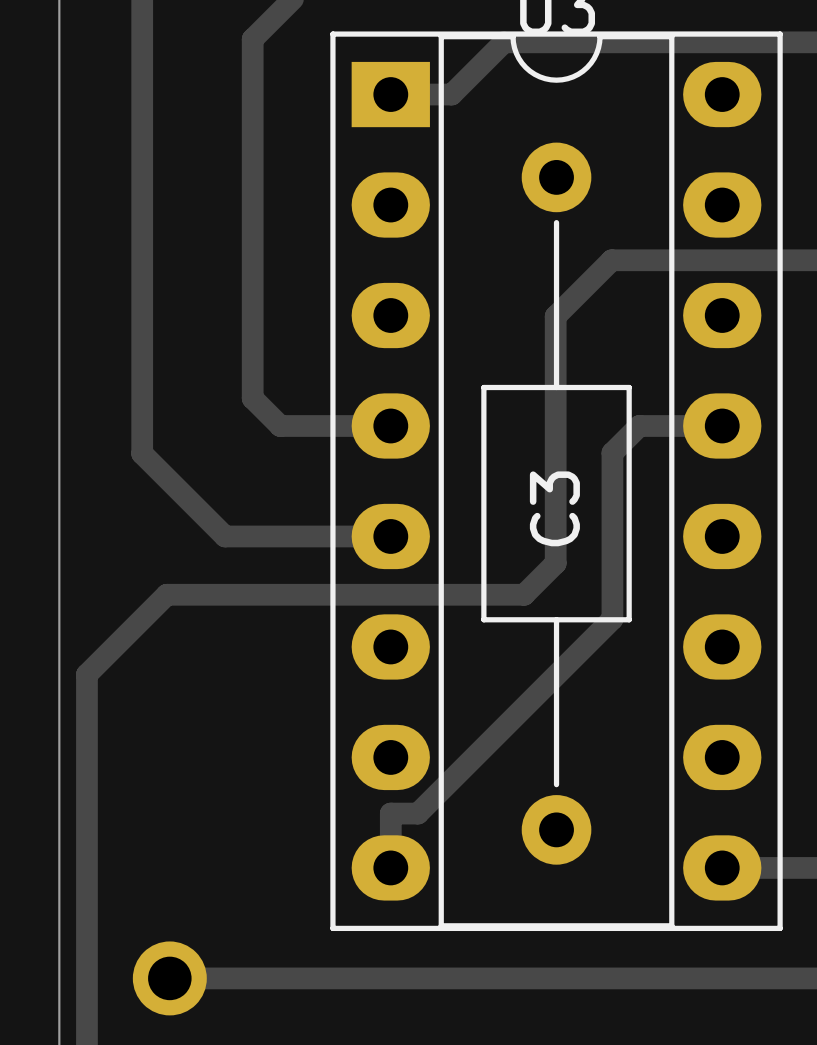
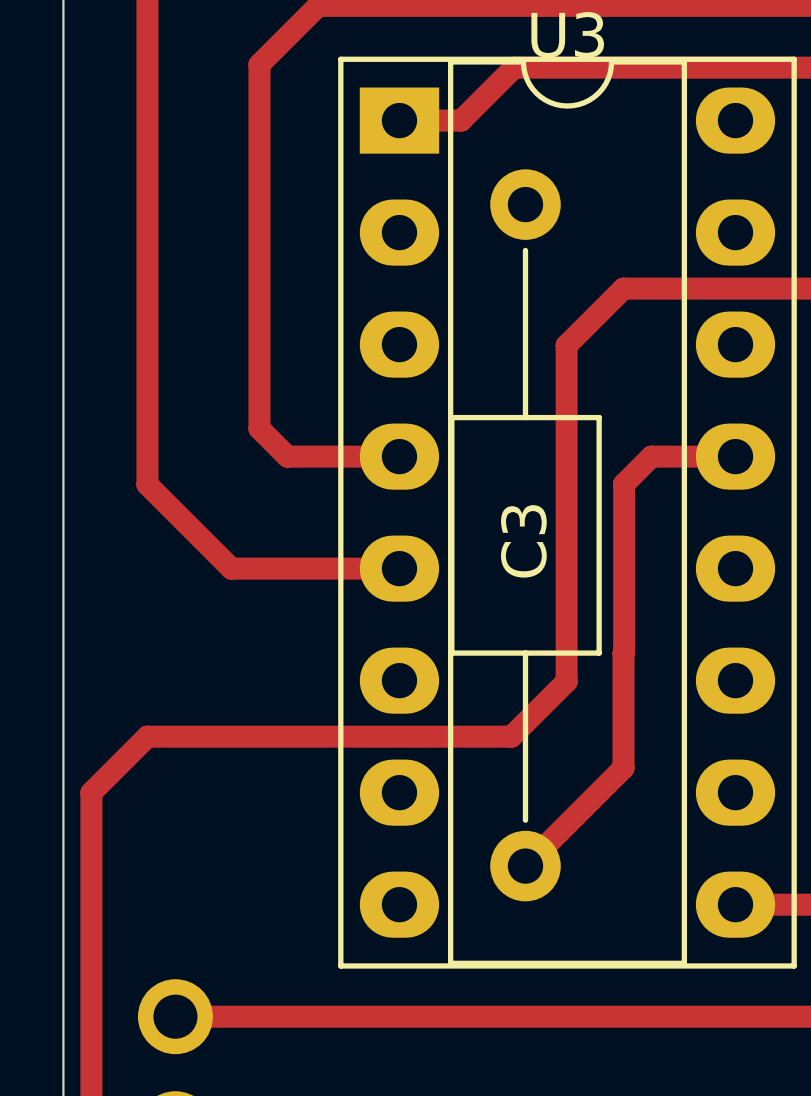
C3 position: (556, 503) -> (525, 535)
track: (555, 563) (524, 594) (166, 594) (86, 674) (86, 757) -> (566, 595) (566, 681) (511, 736) (147, 736) (91, 792)
track: (611, 619) (417, 813) (390, 813) (390, 867) -> (623, 653) (623, 768) (525, 866)

